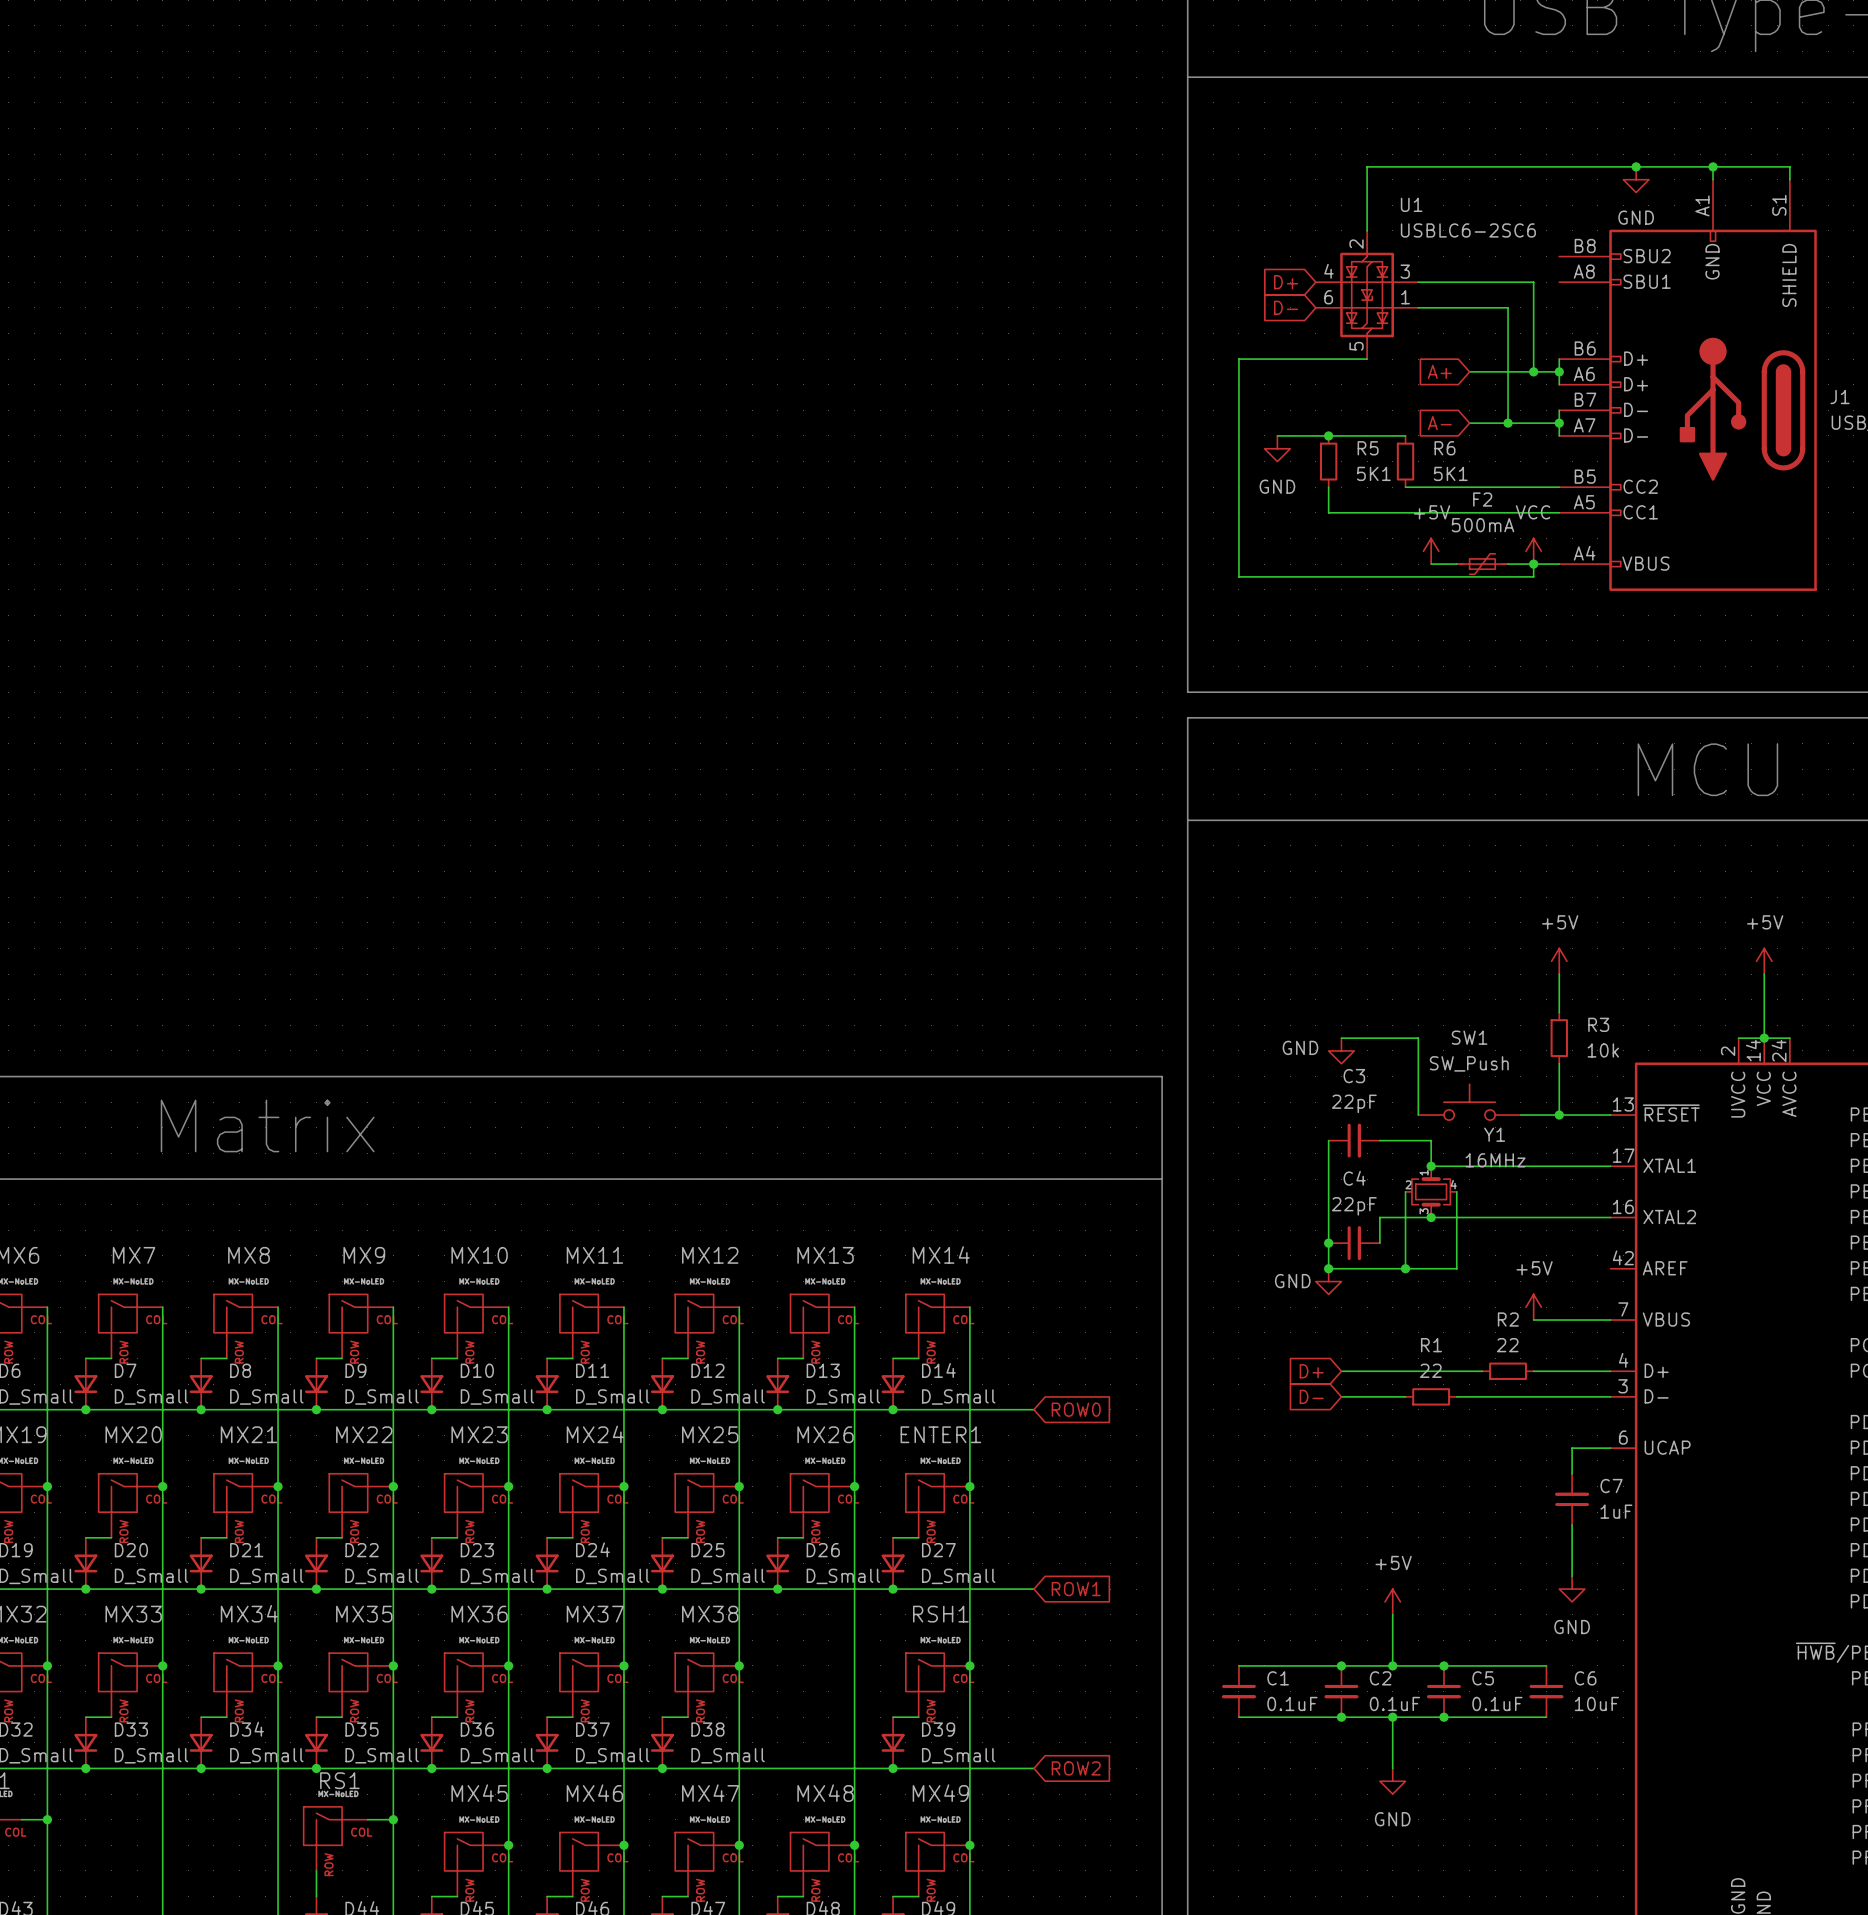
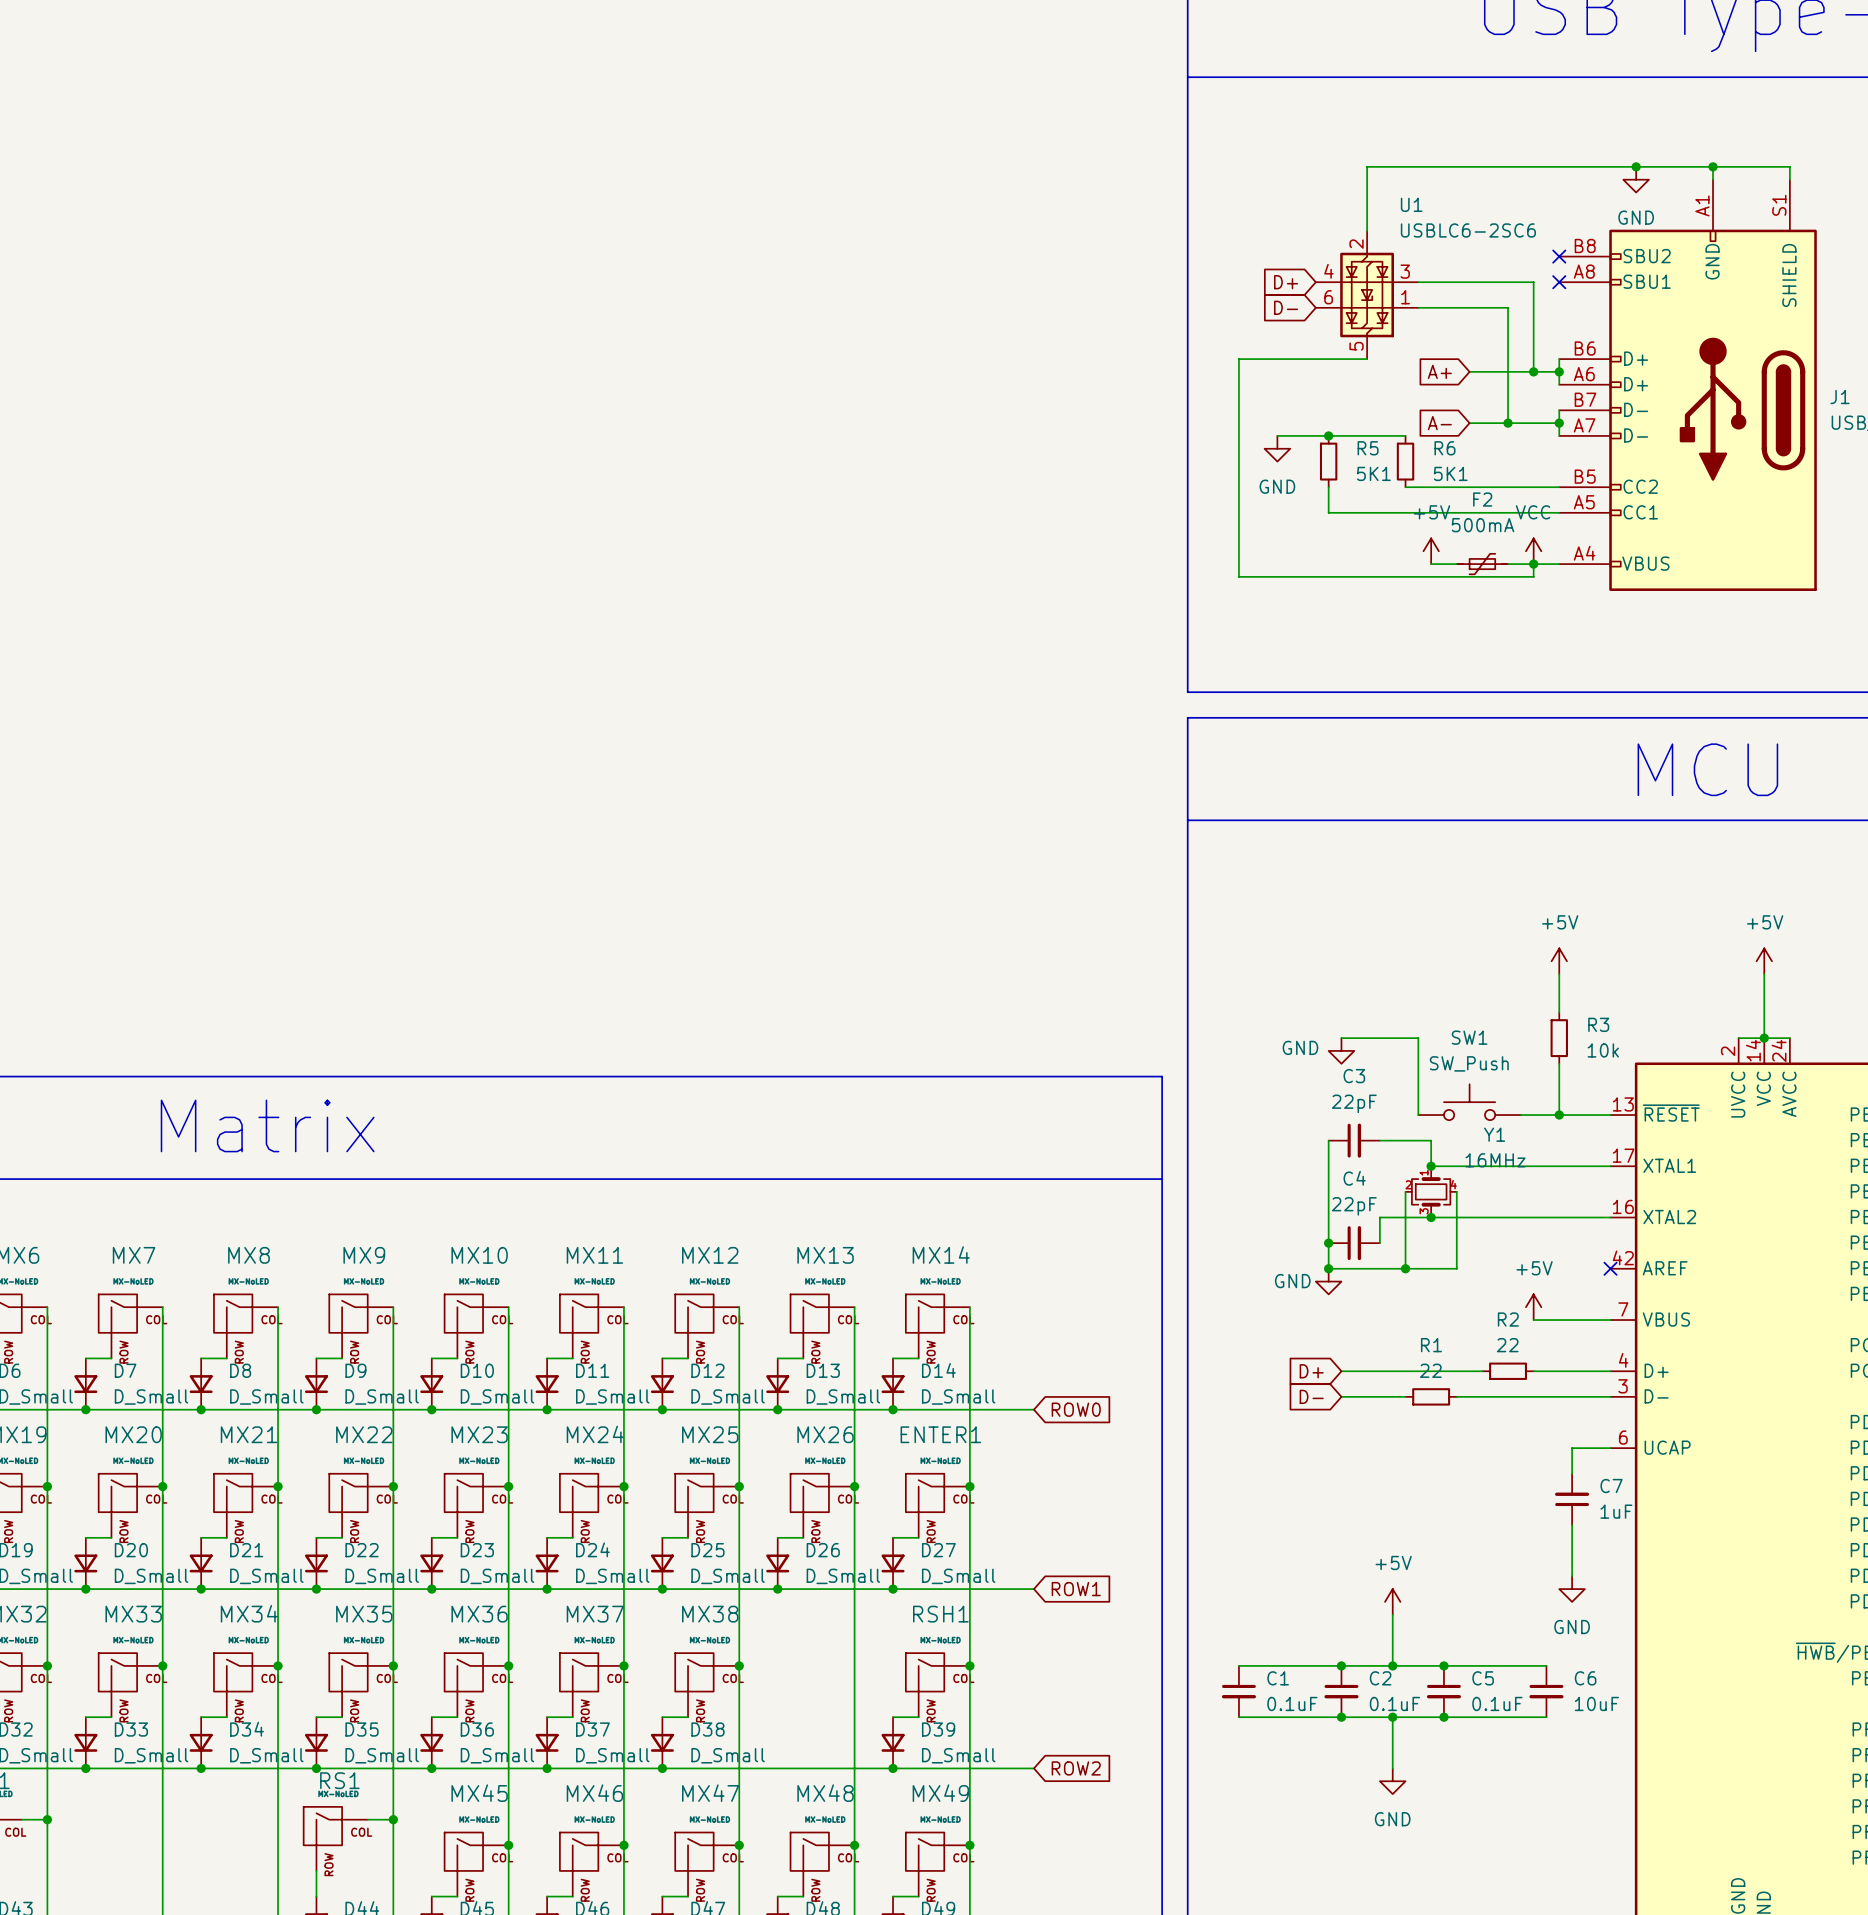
no-connect mark: none -> (1559, 256)
no-connect mark: none -> (1559, 282)
no-connect mark: none -> (1610, 1268)

